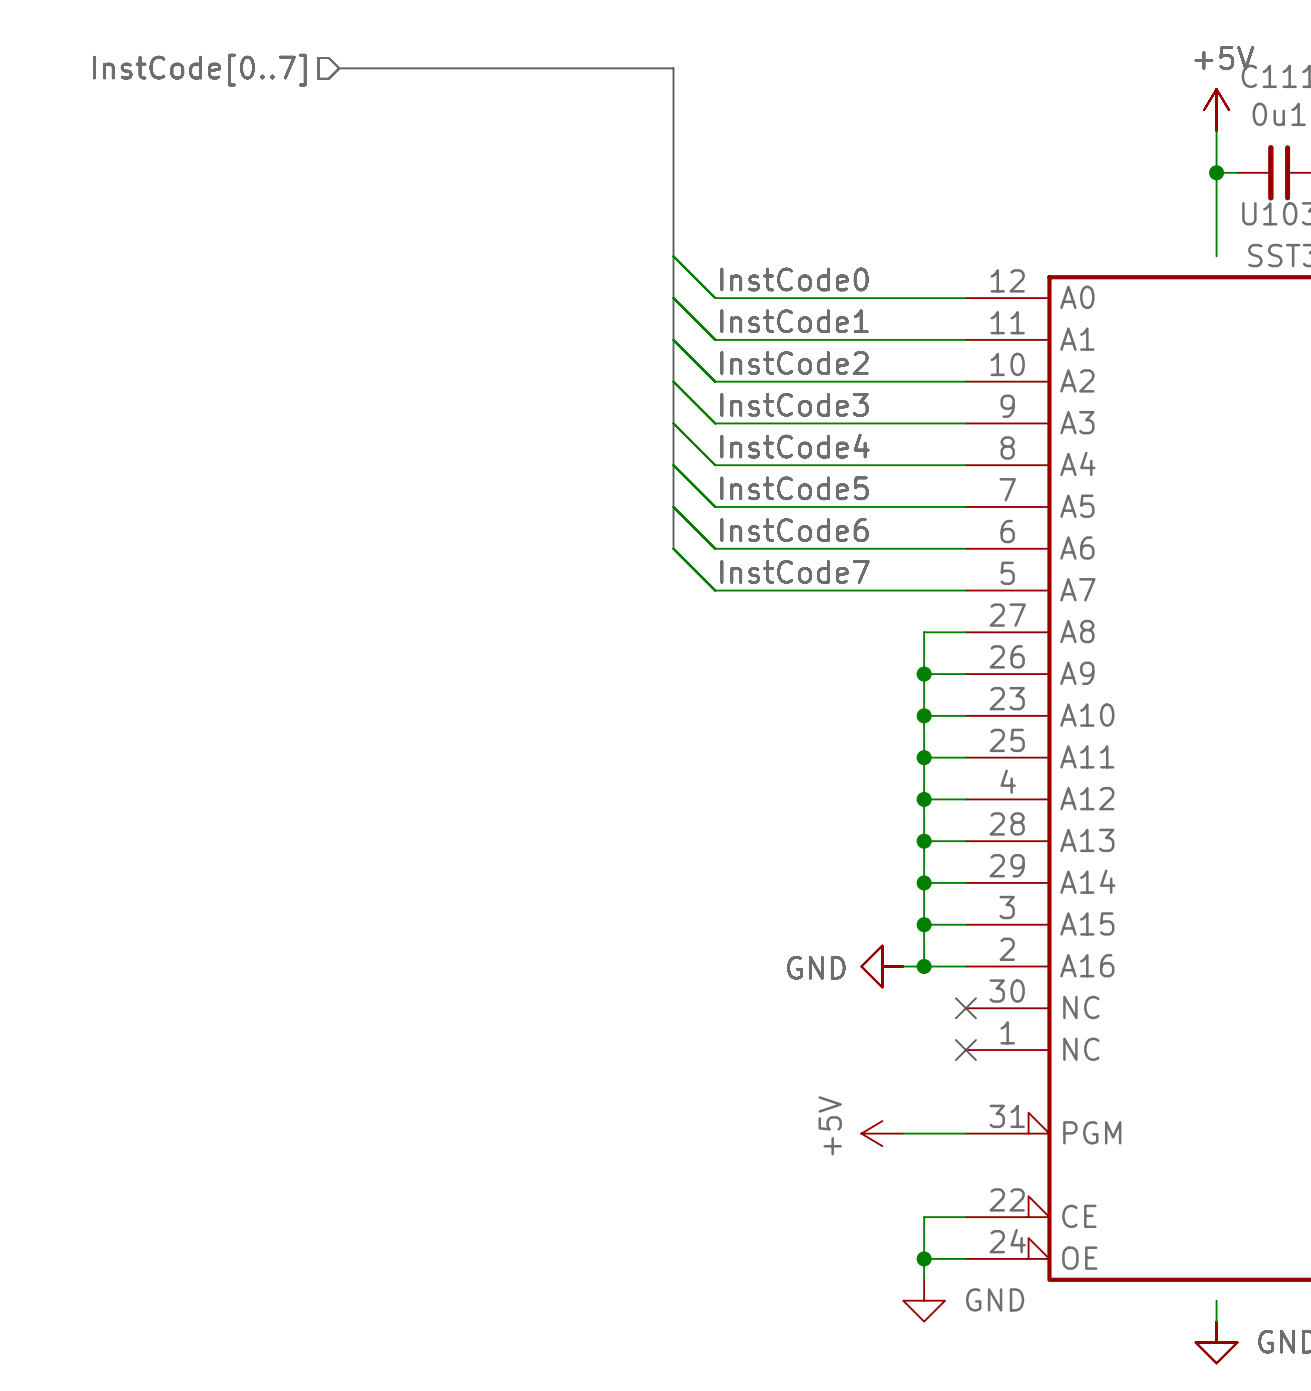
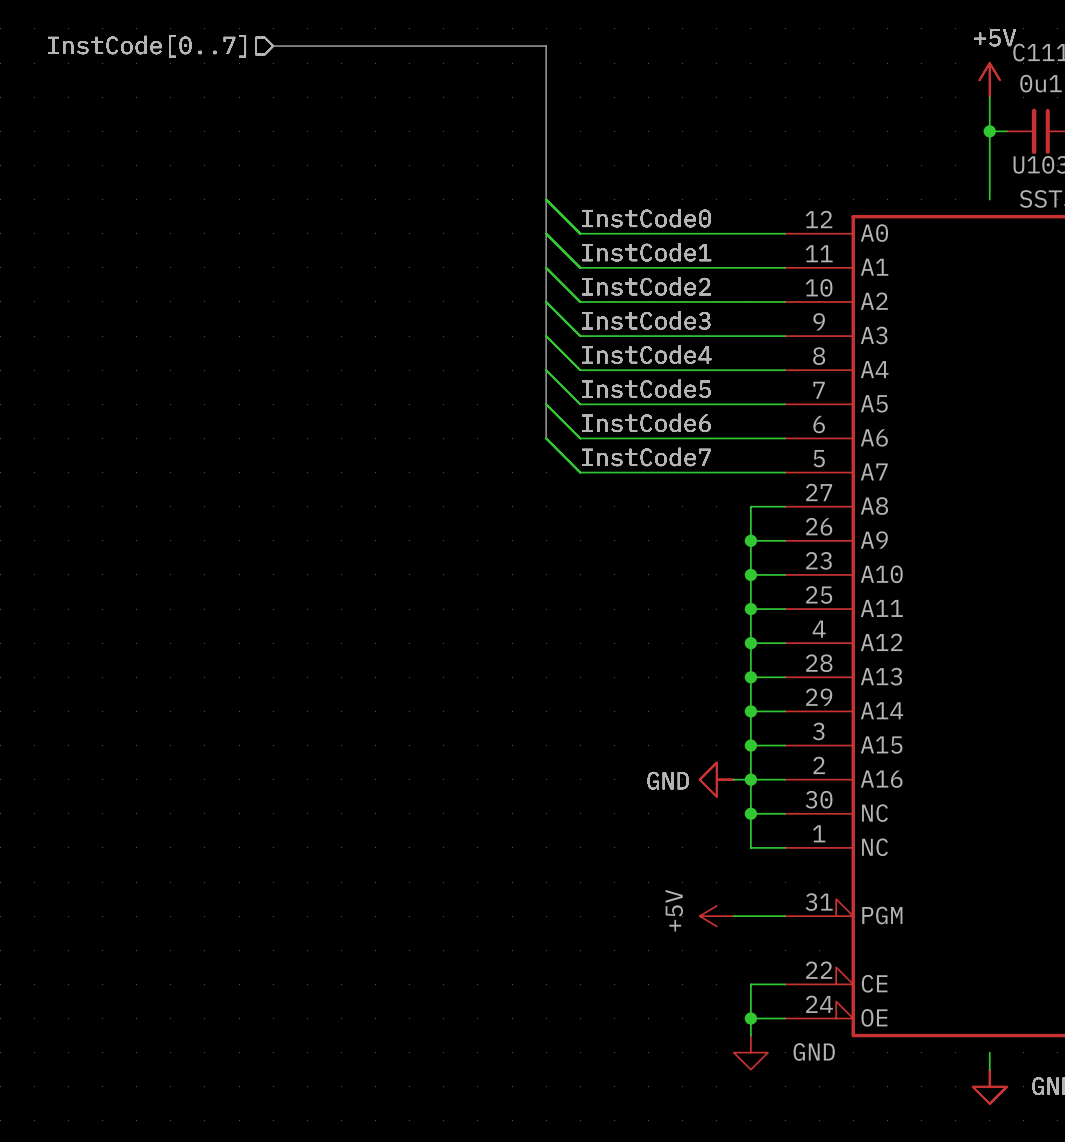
wire: none -> (750, 779) (750, 847) (785, 847)
wire: none -> (750, 813) (785, 813)
junction: none -> (750, 813)
no-connect mark: (965, 1008) -> none
no-connect mark: (965, 1050) -> none

